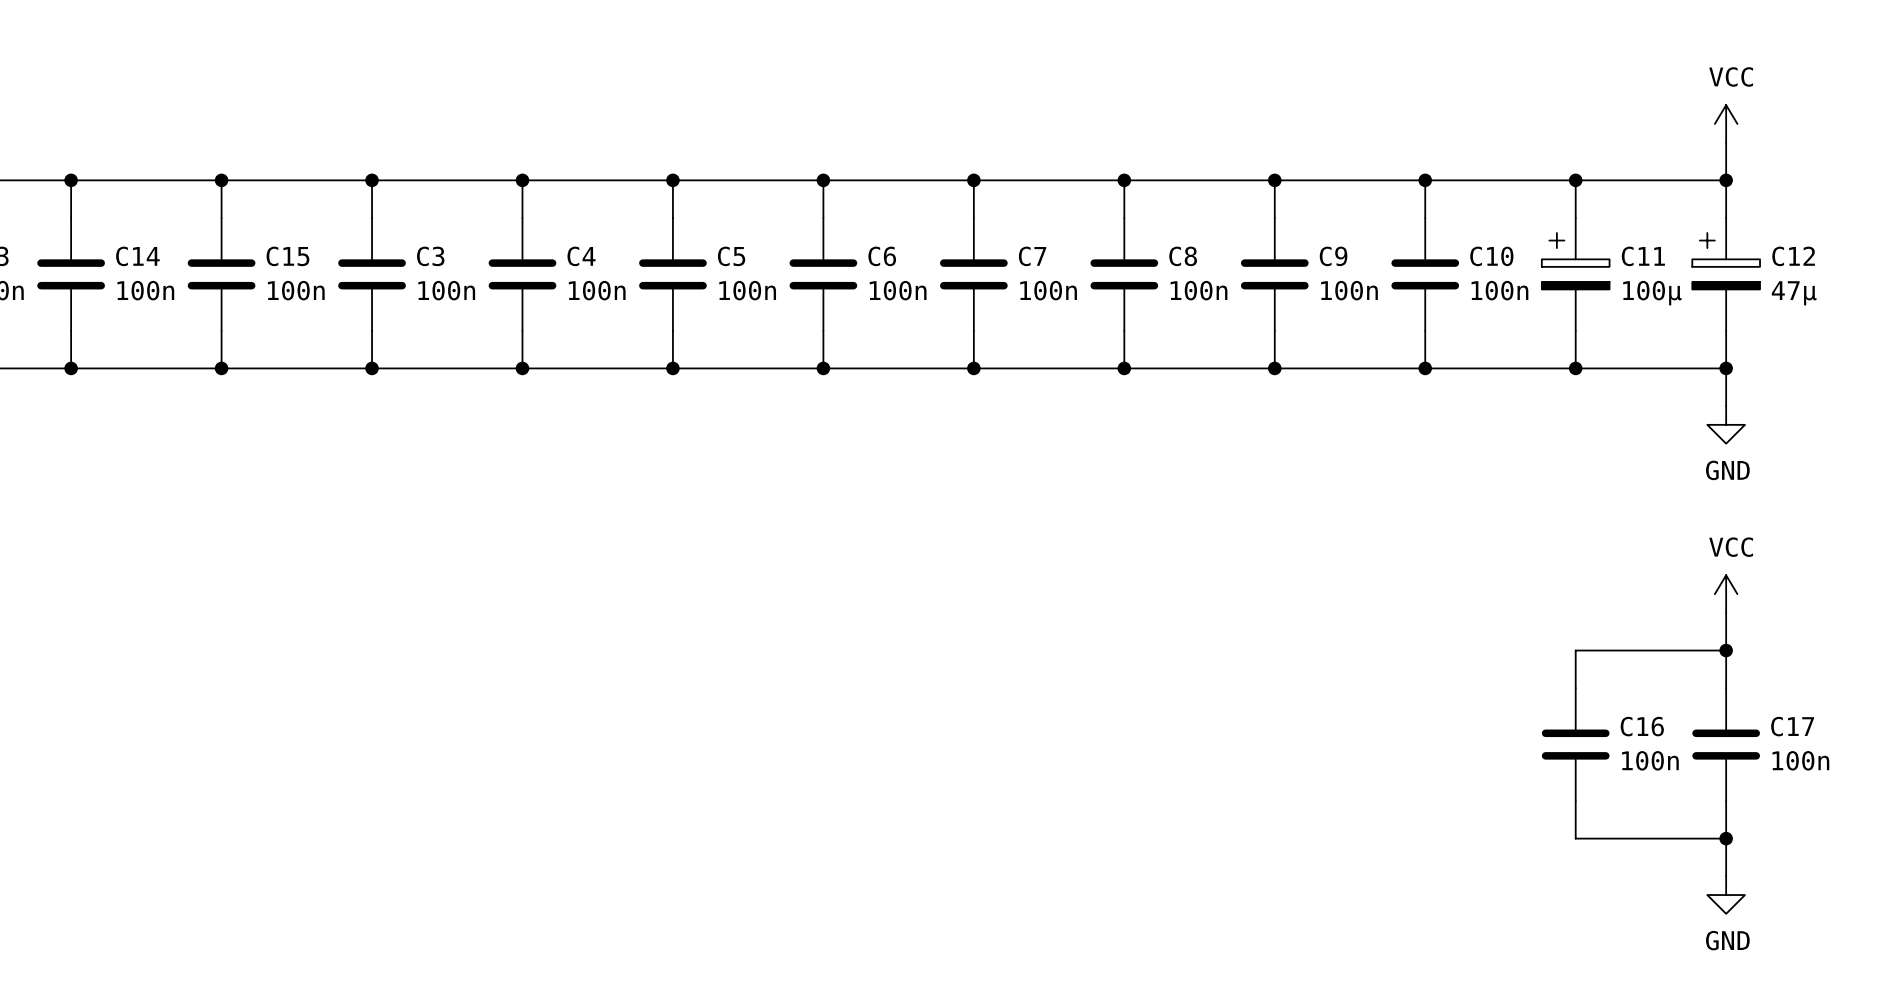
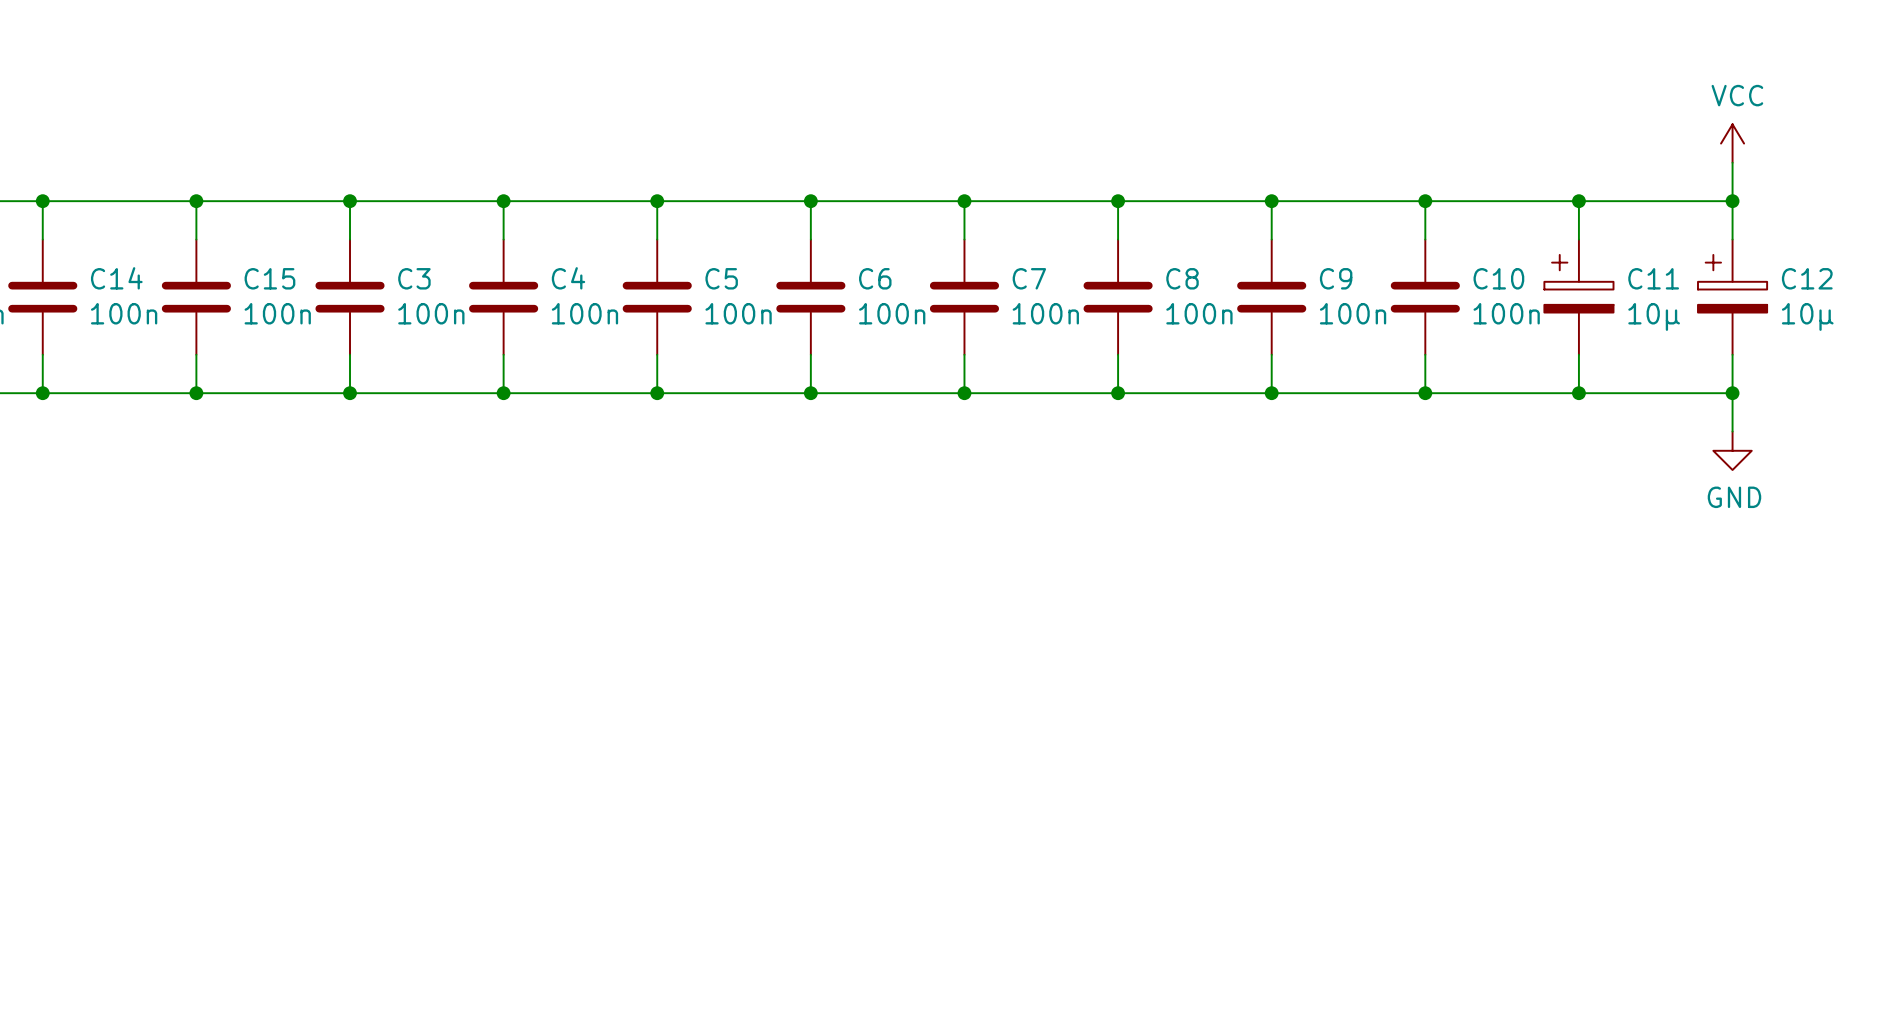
C11 value: 100µ (1652, 293) -> 10µ (1654, 316)
C12 value: 47µ (1794, 293) -> 10µ (1807, 316)
power symbol: VCC (1726, 594) -> none
wire: (1726, 612) (1726, 688) -> none
wire: (1726, 650) (1575, 650) (1575, 688) -> none
junction: (1726, 650) -> none
C16: 100n (1575, 744) -> none
C17: 100n (1726, 744) -> none
wire: (1575, 800) (1575, 838) (1726, 838) -> none
wire: (1726, 800) (1726, 876) -> none
junction: (1726, 838) -> none
power symbol: GND (1726, 895) -> none

